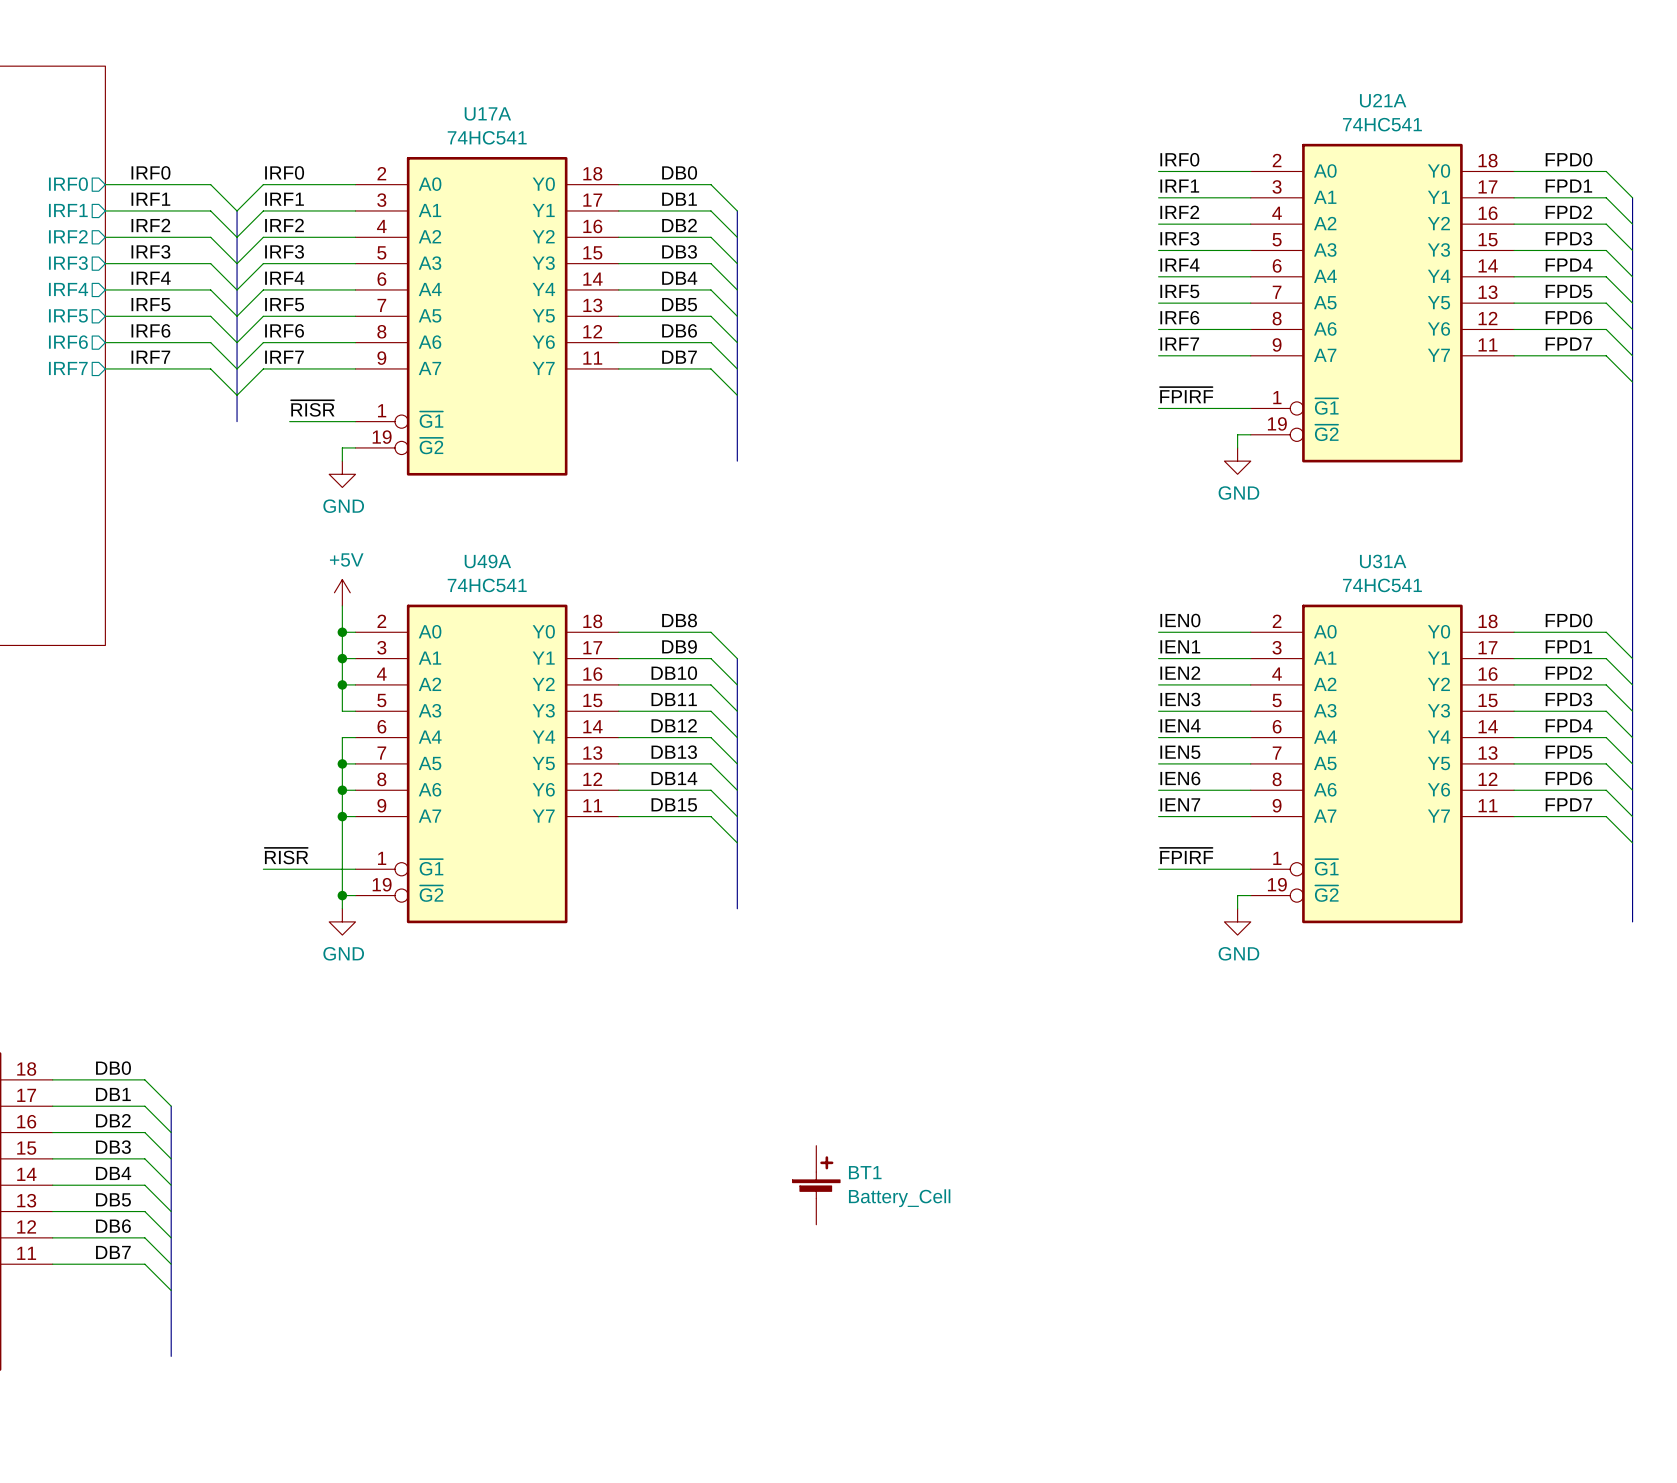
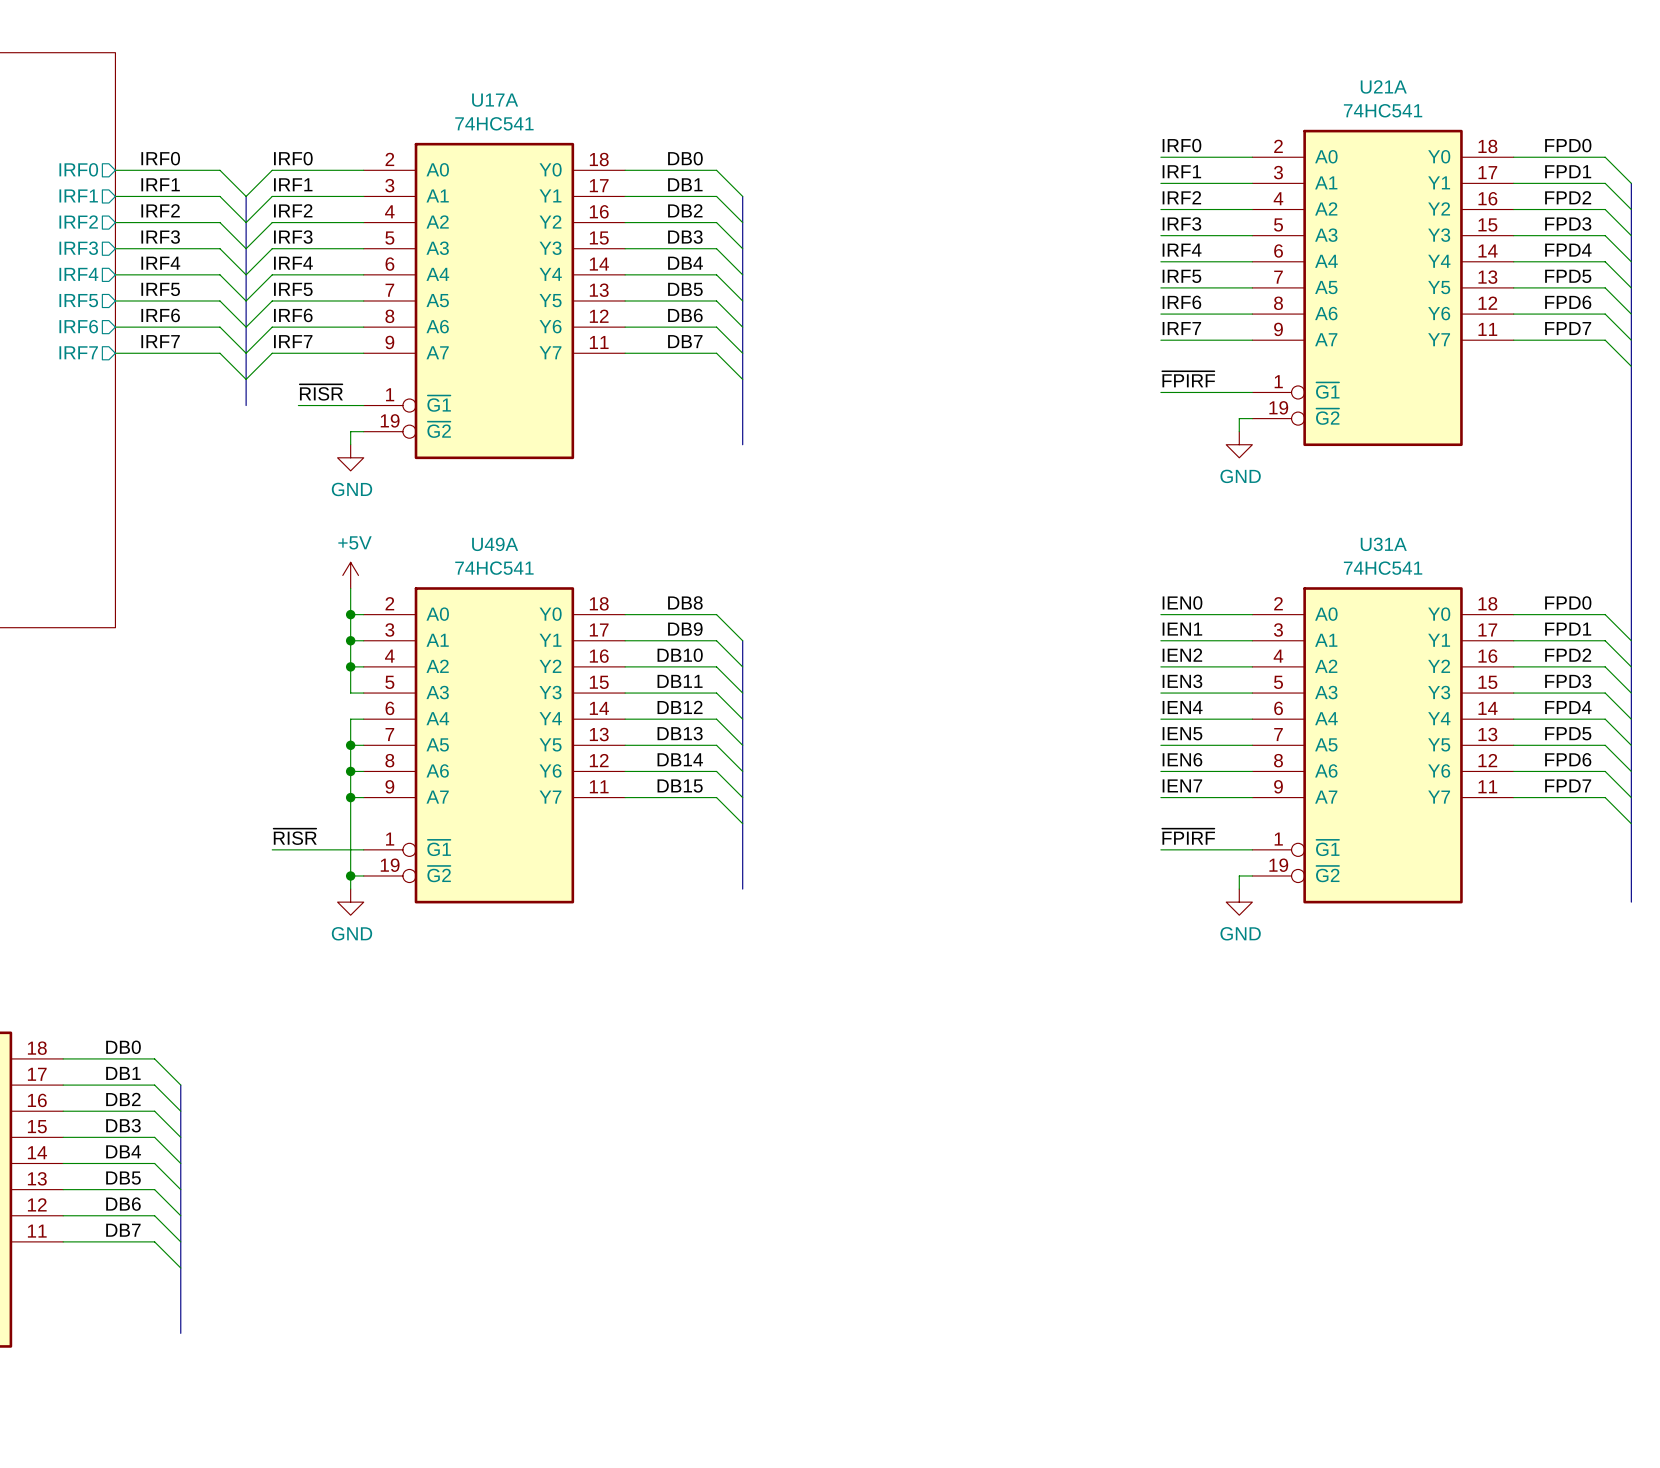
BT1: Battery_Cell (816, 1185) -> none

